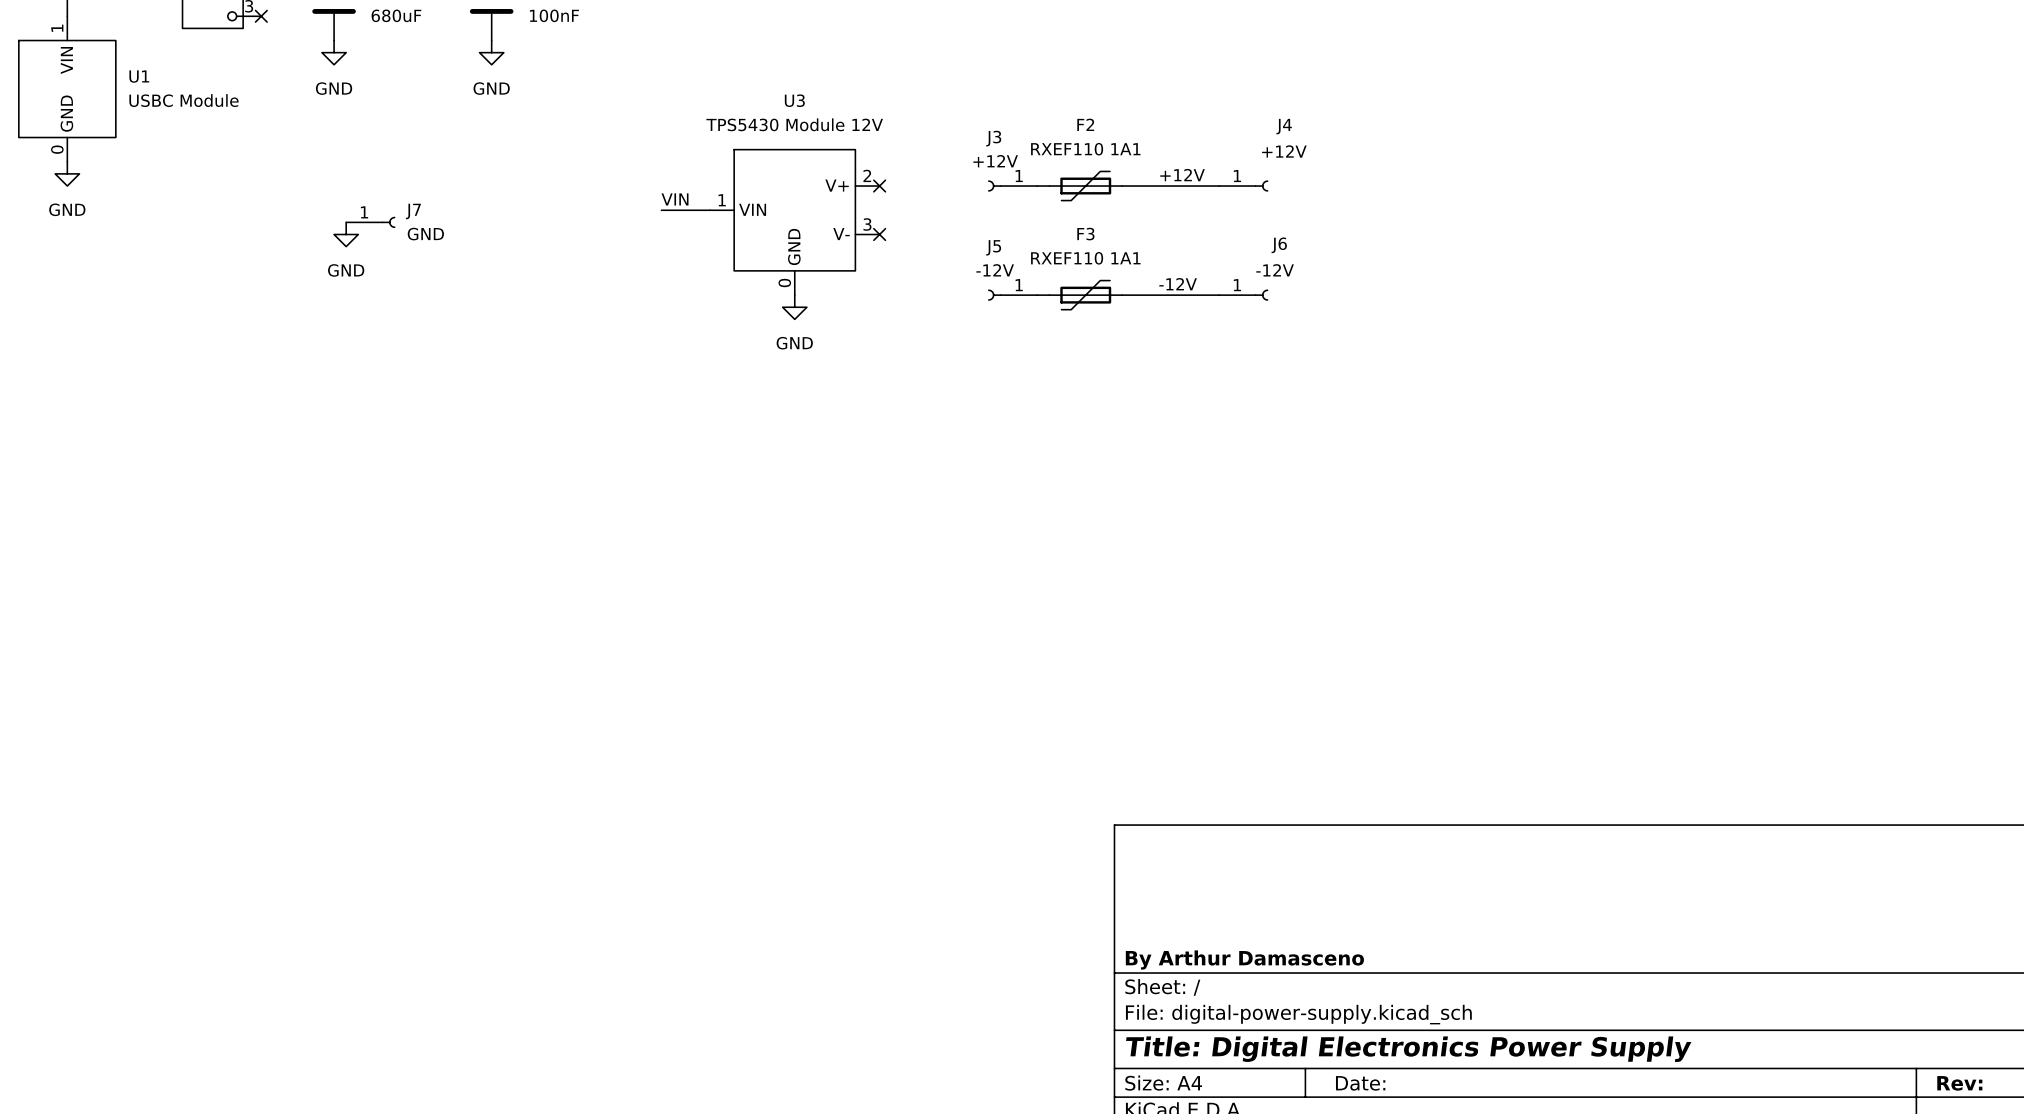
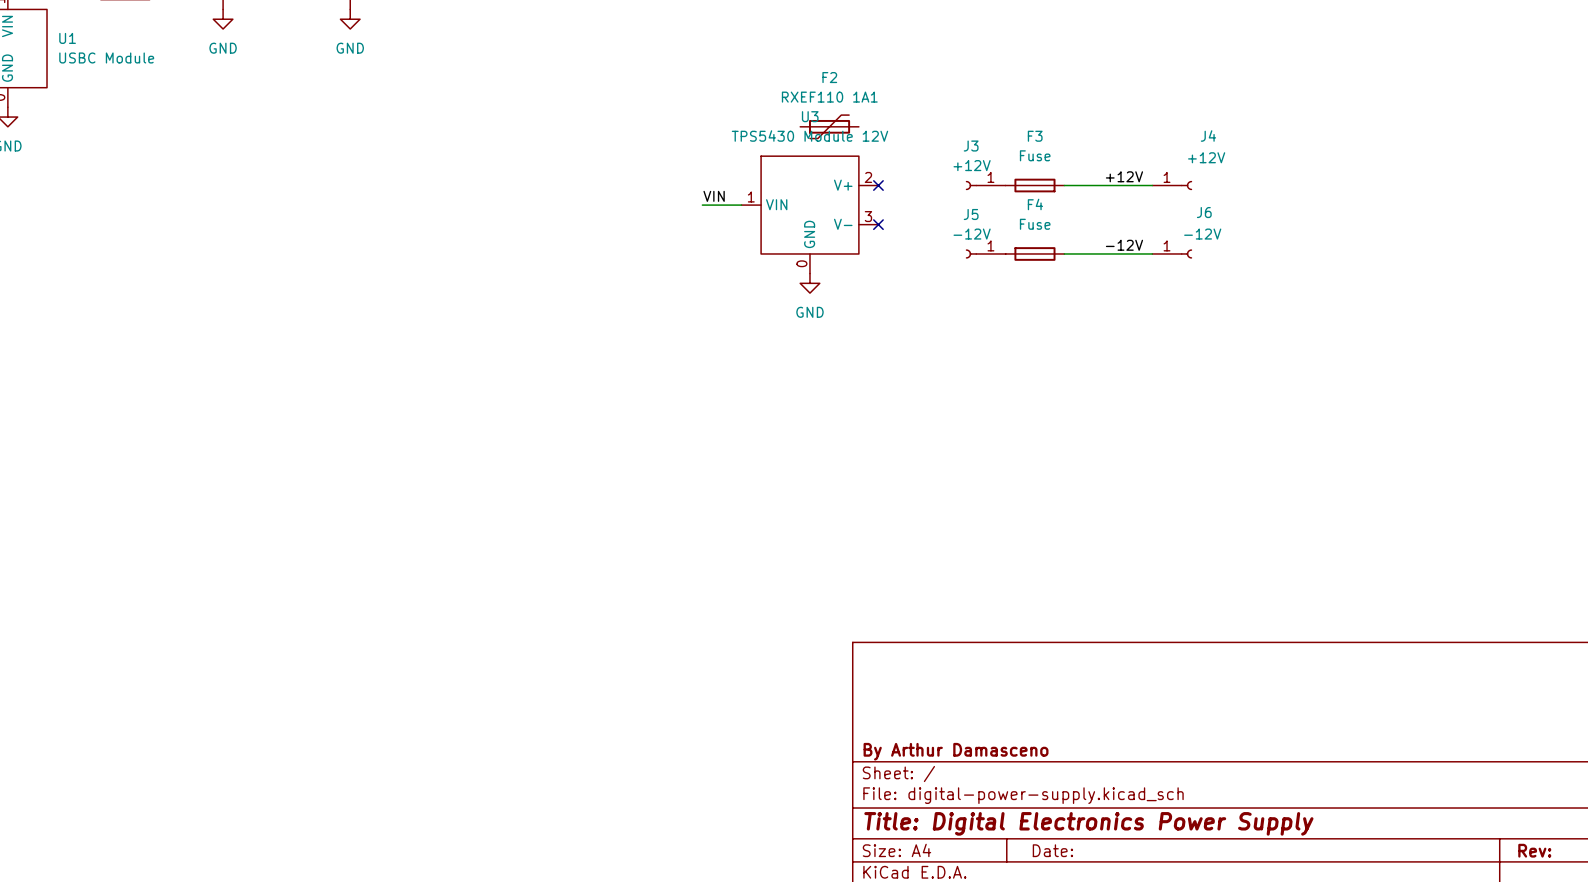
label: +12V (1182, 175) -> none
no-connect mark: (879, 186) -> none
J3 position: (1012, 186) -> (985, 185)
wire: (1037, 186) (1049, 186) -> none
wire: (1122, 186) (1219, 186) -> none
J4 position: (1243, 186) -> (1172, 185)
label: VIN (675, 199) -> none
wire: (661, 210) (709, 210) -> none
J7: GND (370, 222) -> none
U3 position: (794, 222) -> (809, 214)
power symbol: GND (346, 234) -> none
no-connect mark: (879, 234) -> none
label: none -> +12V (1124, 176)
F3 value: RXEF110 1A1 (1085, 258) -> Fuse (1035, 155)
no-connect mark: none -> (878, 185)
wire: none -> (1064, 185) (1152, 185)
label: none -> VIN (714, 196)
F3 symbol: [1049, 280, 1123, 310] -> [1005, 178, 1065, 193]
wire: none -> (702, 205) (741, 205)
label: -12V (1178, 284) -> none
J5 position: (1012, 295) -> (985, 253)
wire: (1037, 295) (1049, 295) -> none
wire: (1122, 295) (1219, 295) -> none
J6 position: (1243, 295) -> (1172, 253)
power symbol: GND (794, 307) -> none
no-connect mark: none -> (878, 224)
label: none -> -12V (1124, 245)
F4: none -> Fuse (1034, 253)
wire: none -> (1064, 253) (1152, 253)
power symbol: none -> GND (809, 283)

